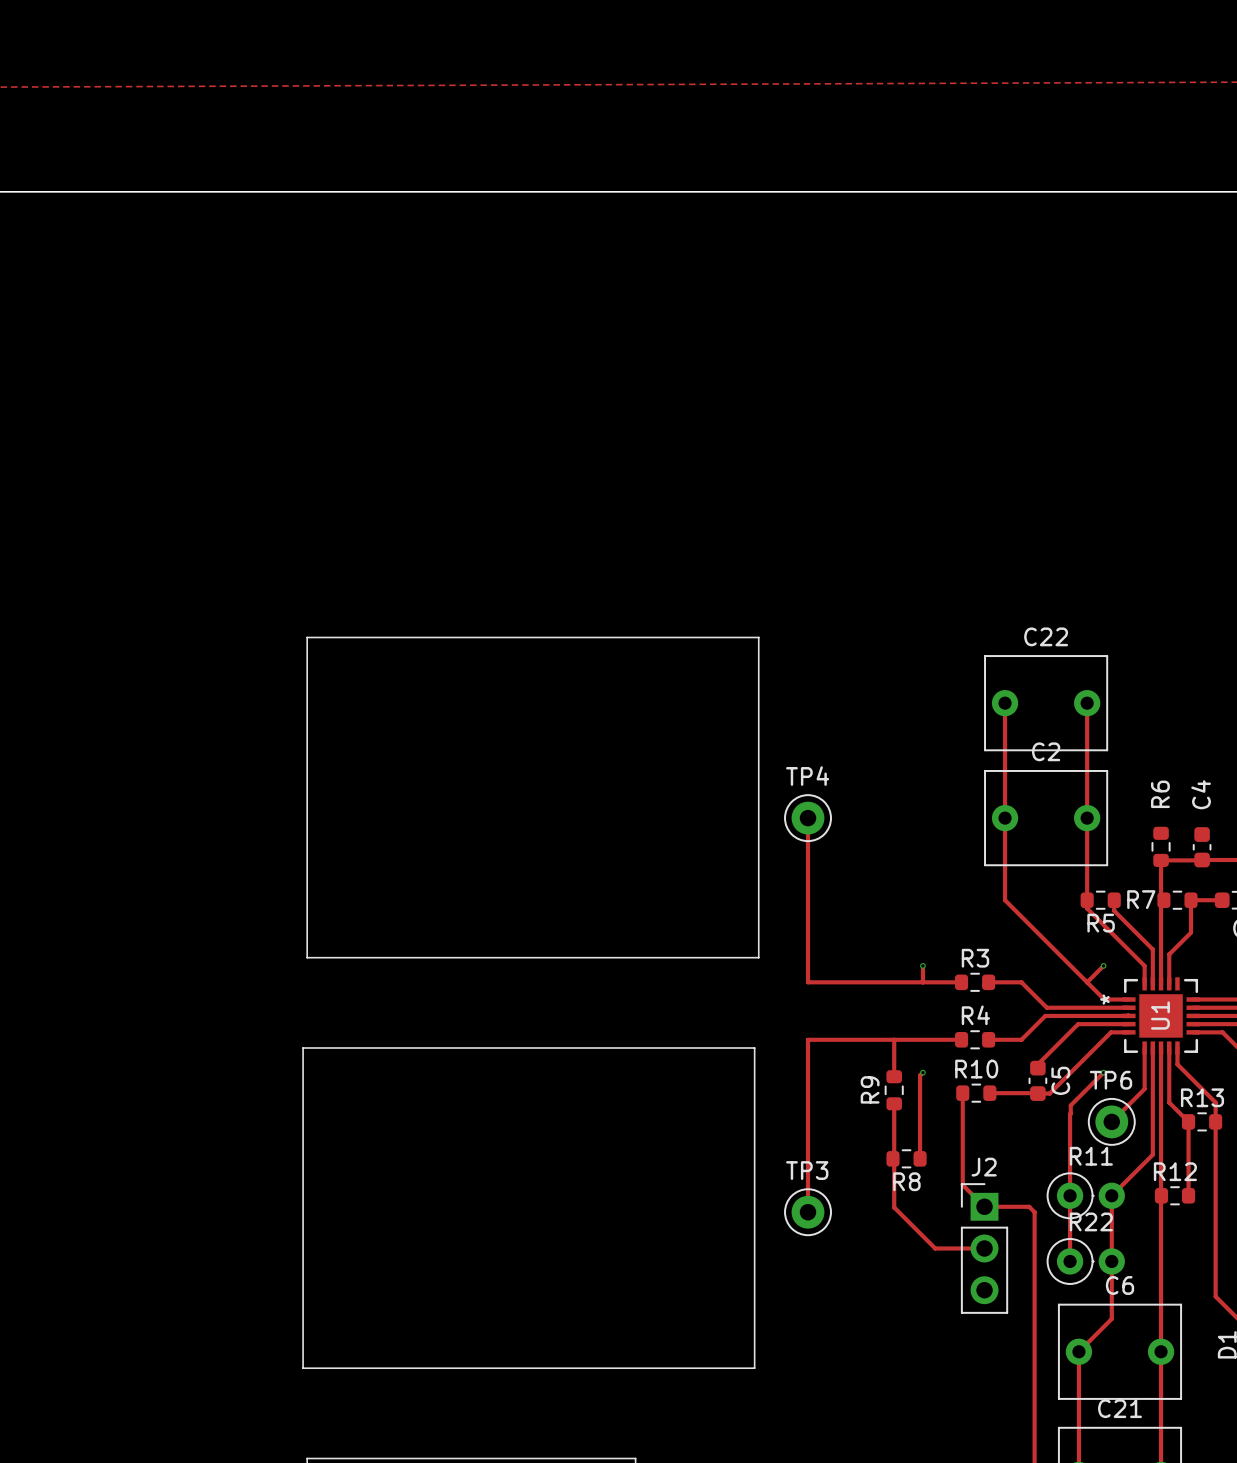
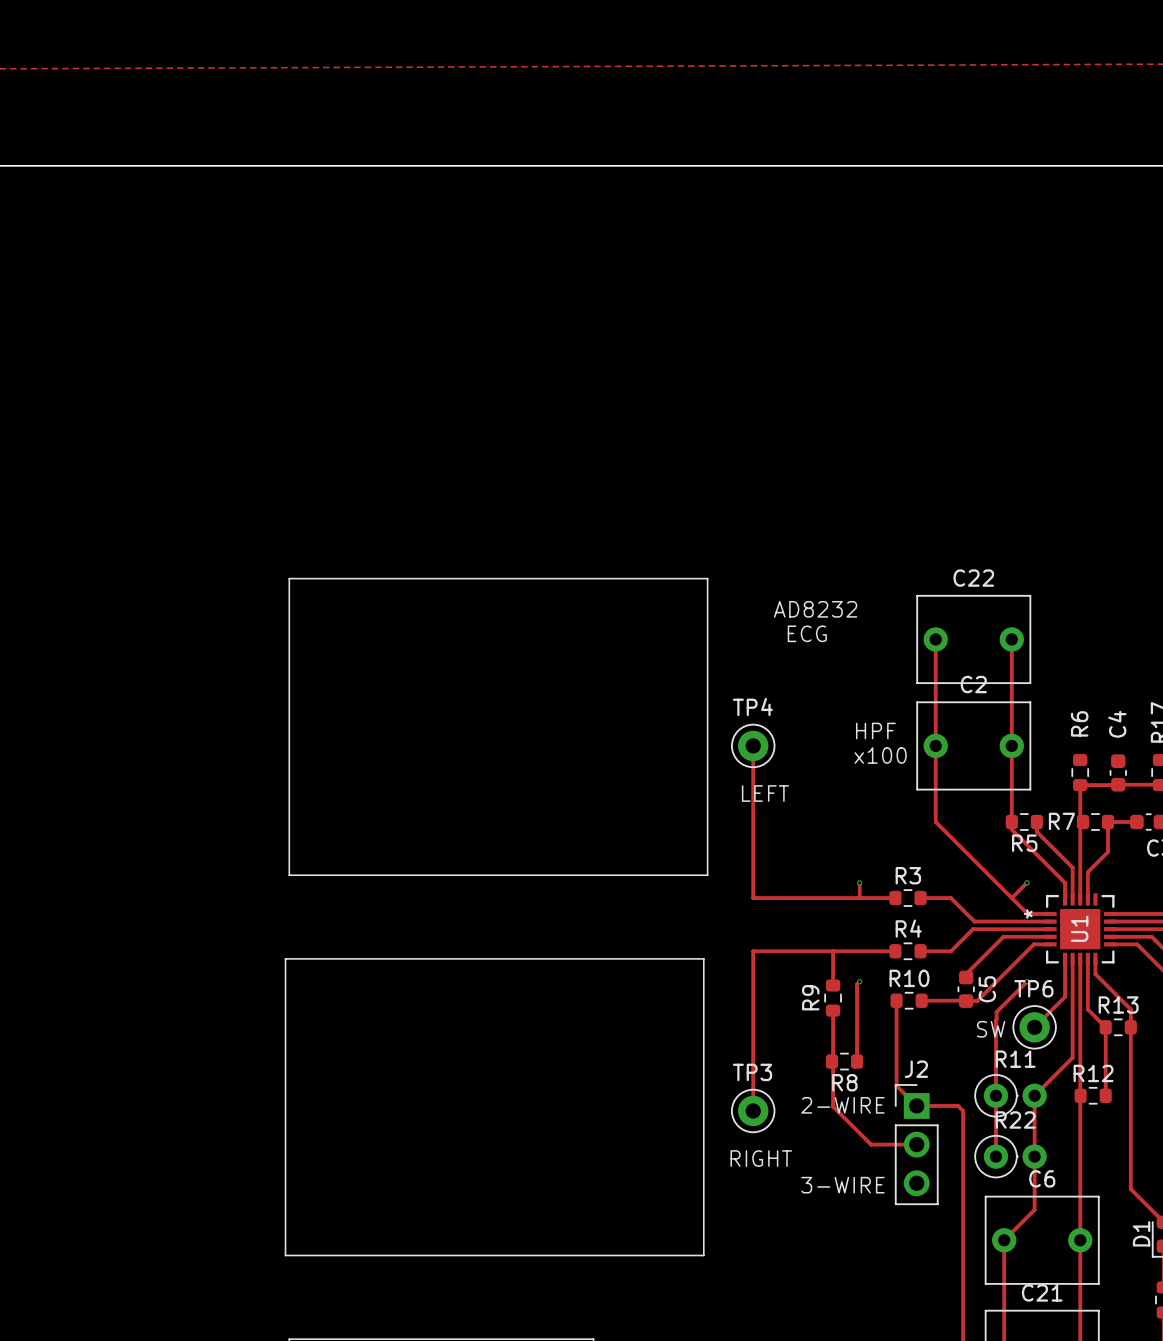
text: none -> AD8232 (815, 609)
text: none -> ECG (807, 633)
text: none -> HPF (875, 731)
text: none -> x100 (880, 755)
text: none -> LEFT (765, 793)
text: none -> SW (991, 1029)
text: none -> 2-WIRE (842, 1105)
text: none -> RIGHT (761, 1158)
text: none -> 3-WIRE (842, 1185)

